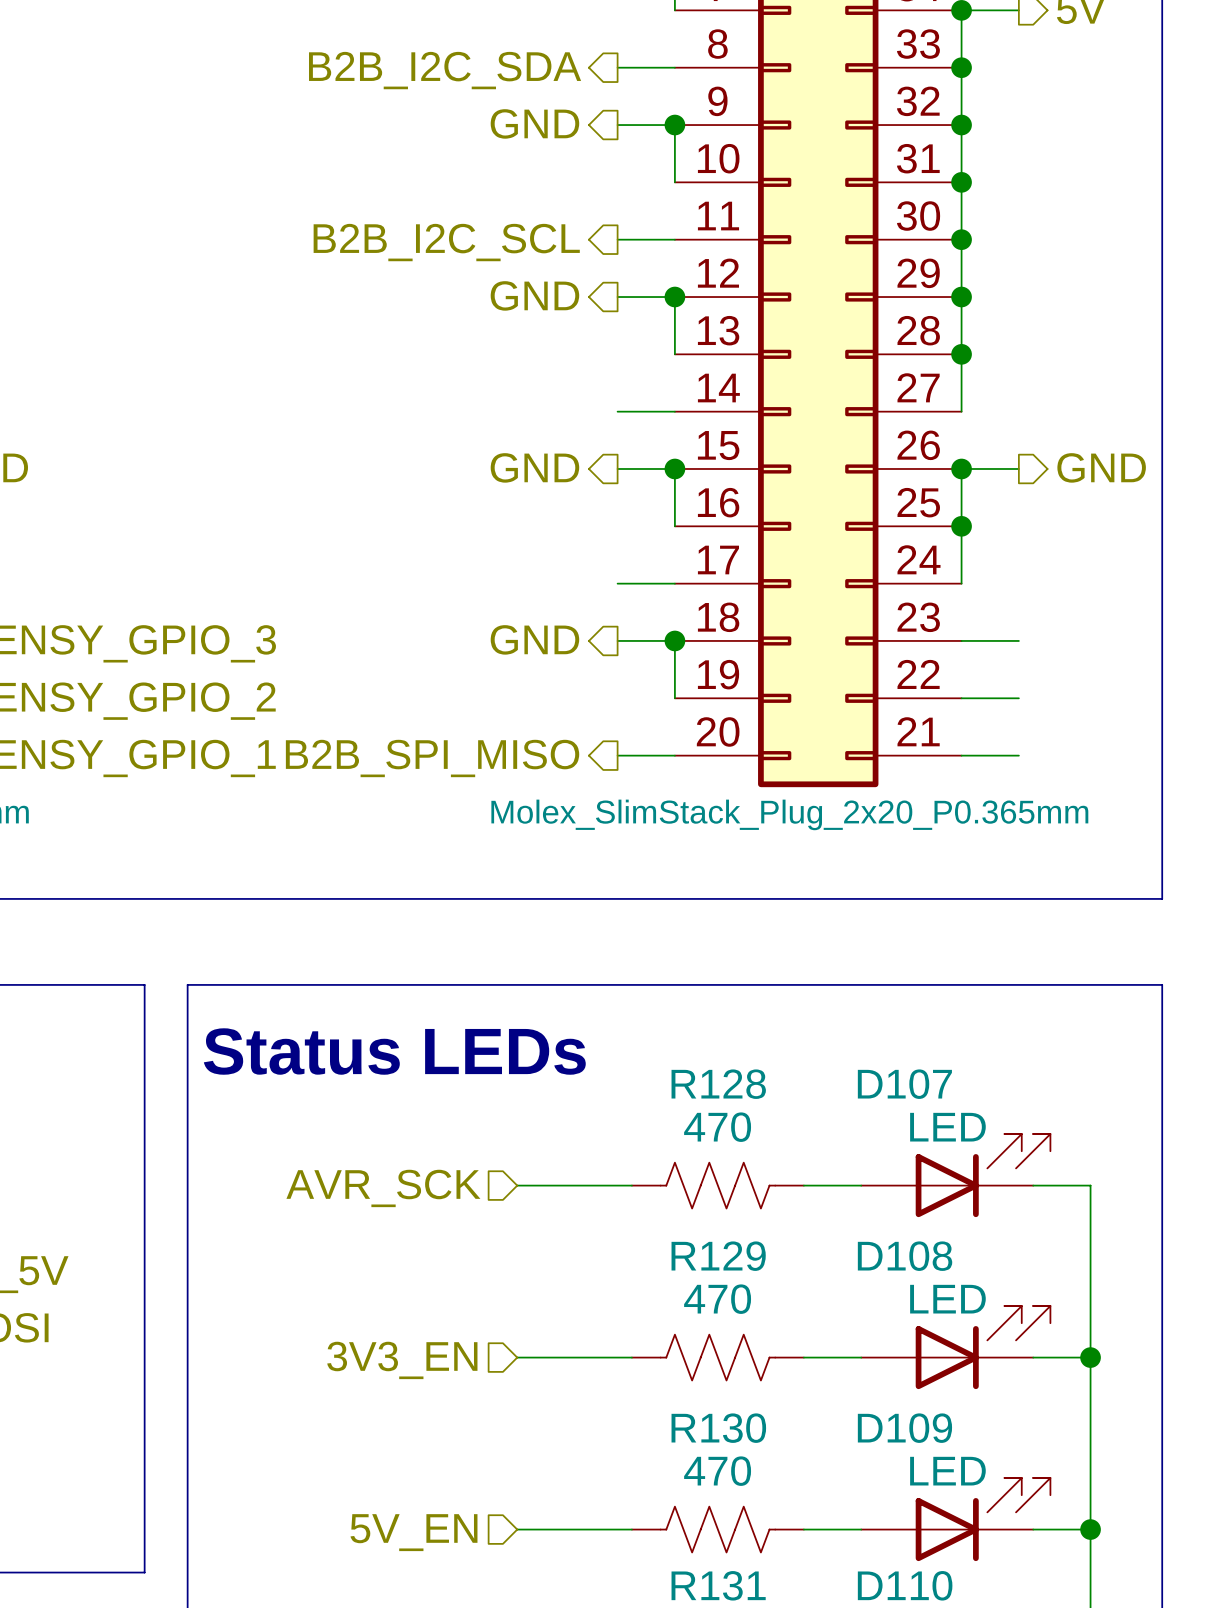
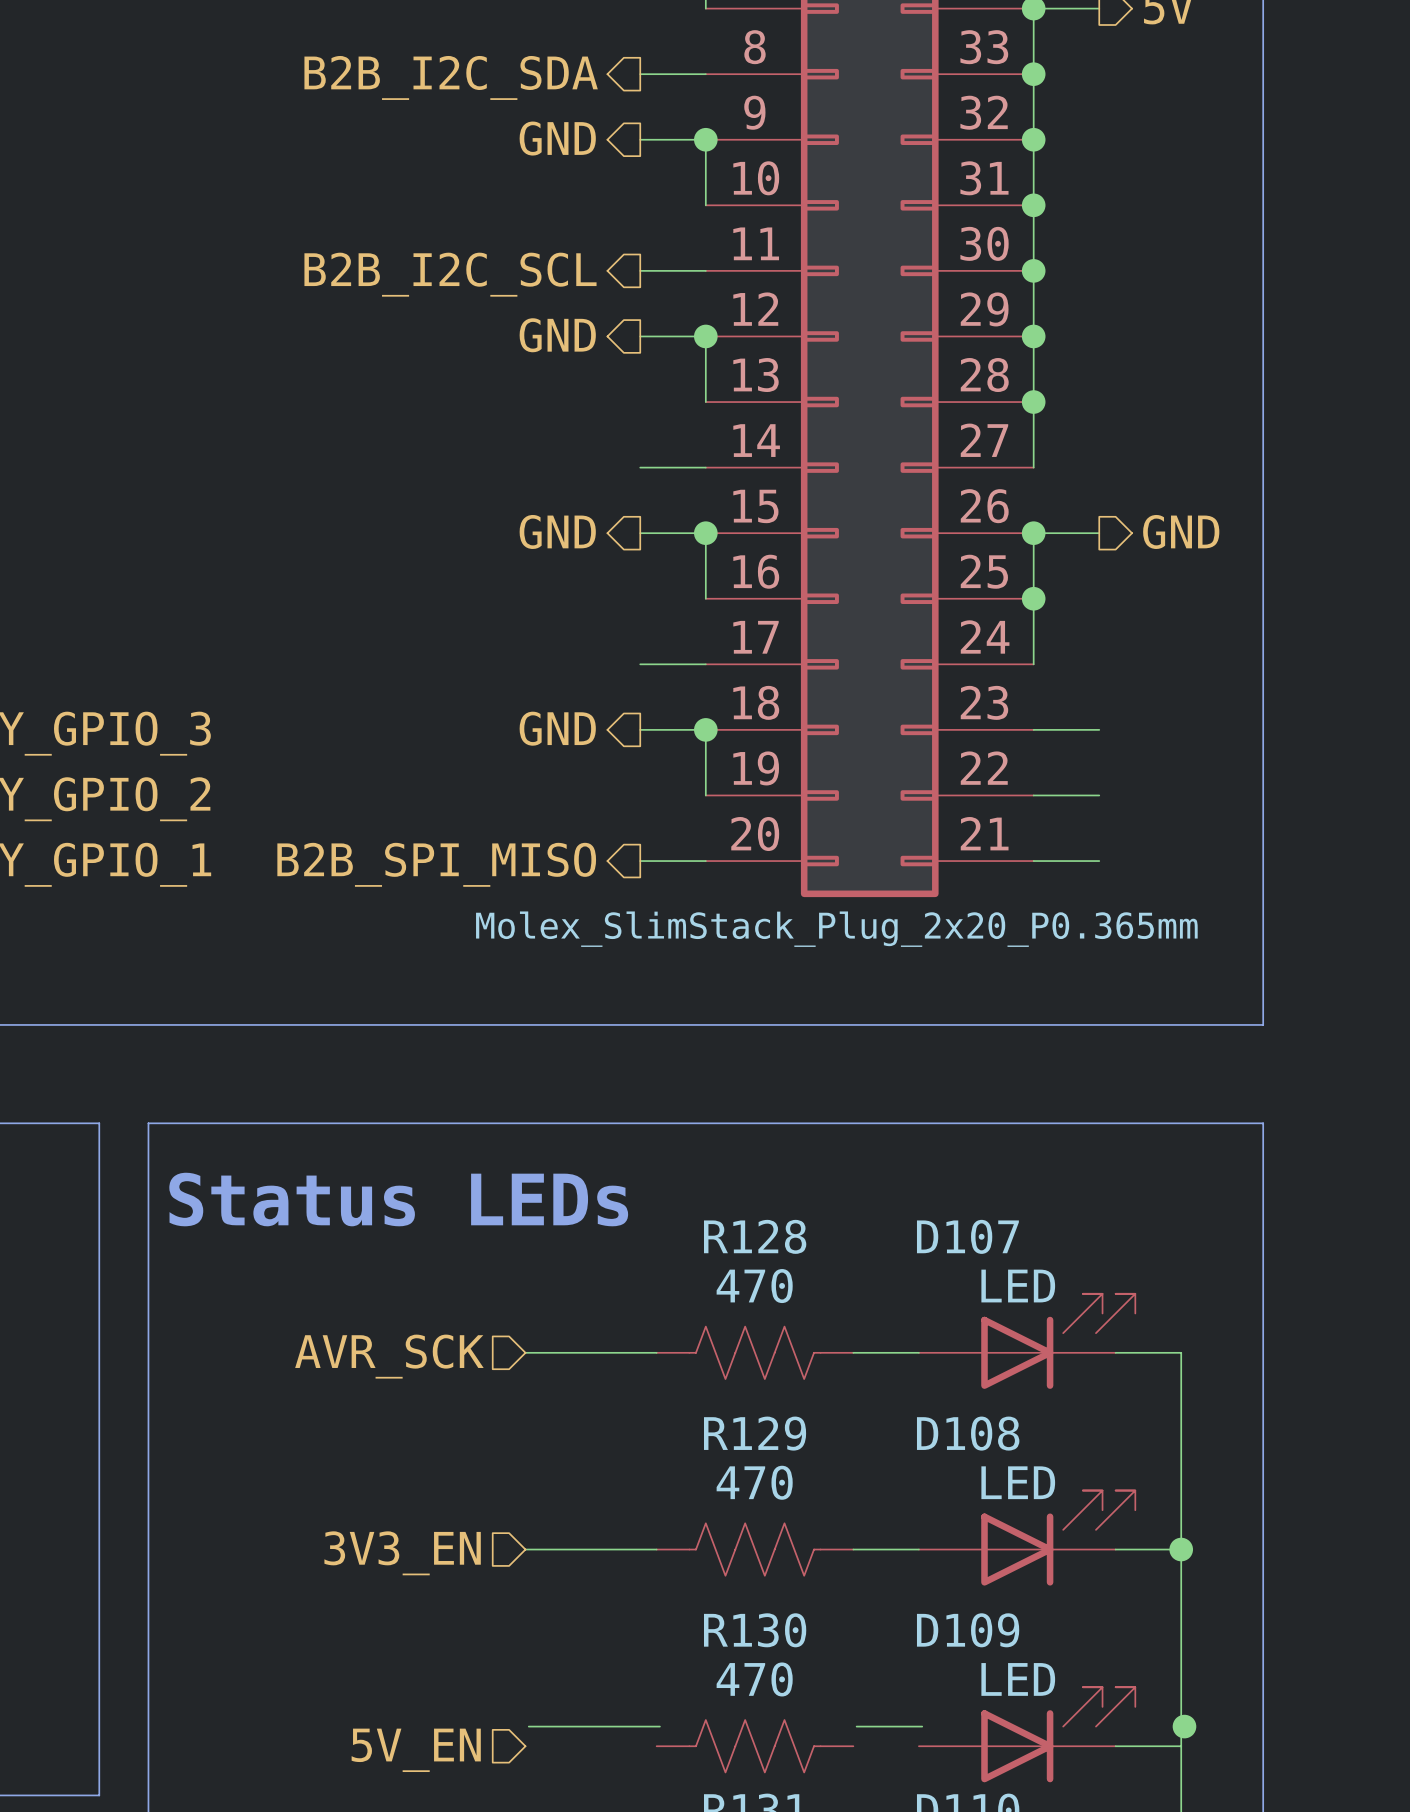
wire: (517, 1529) (631, 1529) -> (528, 1726) (659, 1726)
wire: (803, 1529) (861, 1529) -> (856, 1726) (922, 1726)
junction position: (1090, 1529) -> (1184, 1726)

